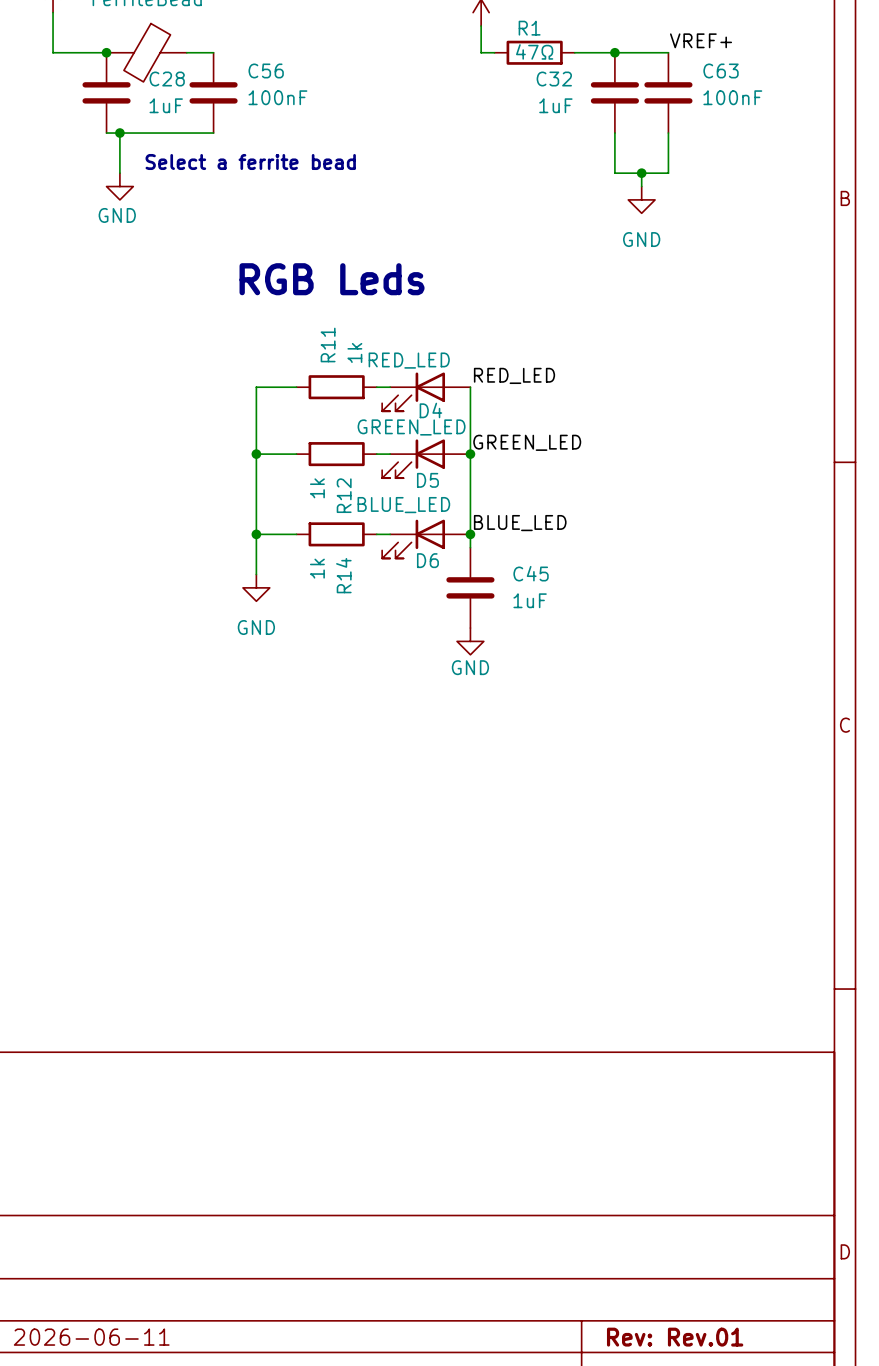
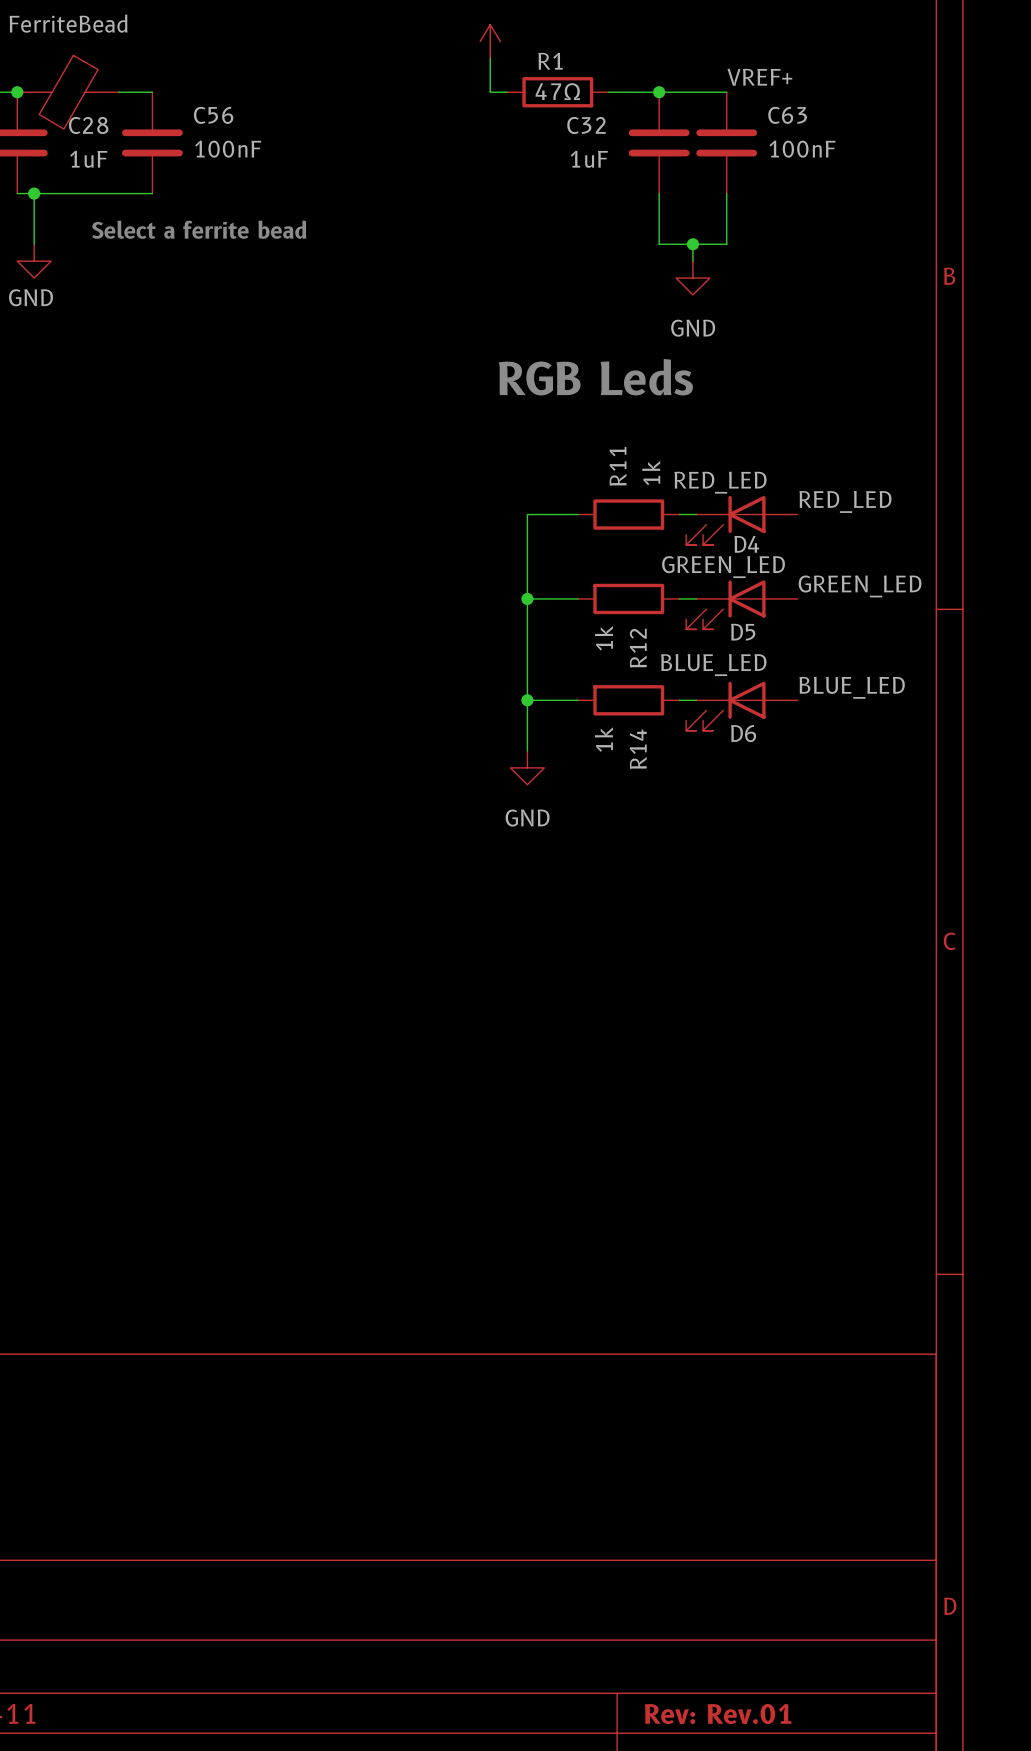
text position: RGB Leds (332, 279) -> RGB Leds (595, 377)
label position: RED_LED (514, 375) -> RED_LED (845, 501)
wire: (296, 387) (256, 387) (256, 574) -> (578, 514) (527, 514) (527, 750)
R11 position: (336, 387) -> (628, 514)
wire: (376, 387) (390, 387) -> (679, 514) (696, 514)
wire: (470, 387) (470, 547) -> none
D4 position: (426, 391) -> (741, 520)
label position: GREEN_LED (527, 442) -> GREEN_LED (860, 586)
wire: (256, 454) (296, 454) -> (527, 598) (578, 598)
junction: (256, 454) -> none
R12 position: (336, 454) -> (628, 598)
wire: (376, 454) (390, 454) -> (679, 598) (696, 598)
junction position: (470, 454) -> (527, 598)
D5 position: (426, 458) -> (741, 604)
label position: BLUE_LED (520, 523) -> BLUE_LED (852, 687)
wire: (256, 534) (296, 534) -> (527, 700) (578, 700)
junction: (256, 534) -> none
R14 position: (336, 534) -> (628, 700)
wire: (376, 534) (390, 534) -> (679, 700) (696, 700)
junction position: (470, 534) -> (527, 700)
D6 position: (426, 539) -> (741, 706)
power symbol: GND (256, 587) -> none
C45: 1uF (470, 587) -> none
power symbol position: GND (470, 641) -> GND (527, 767)
power symbol text position: GND (470, 667) -> GND (527, 818)

